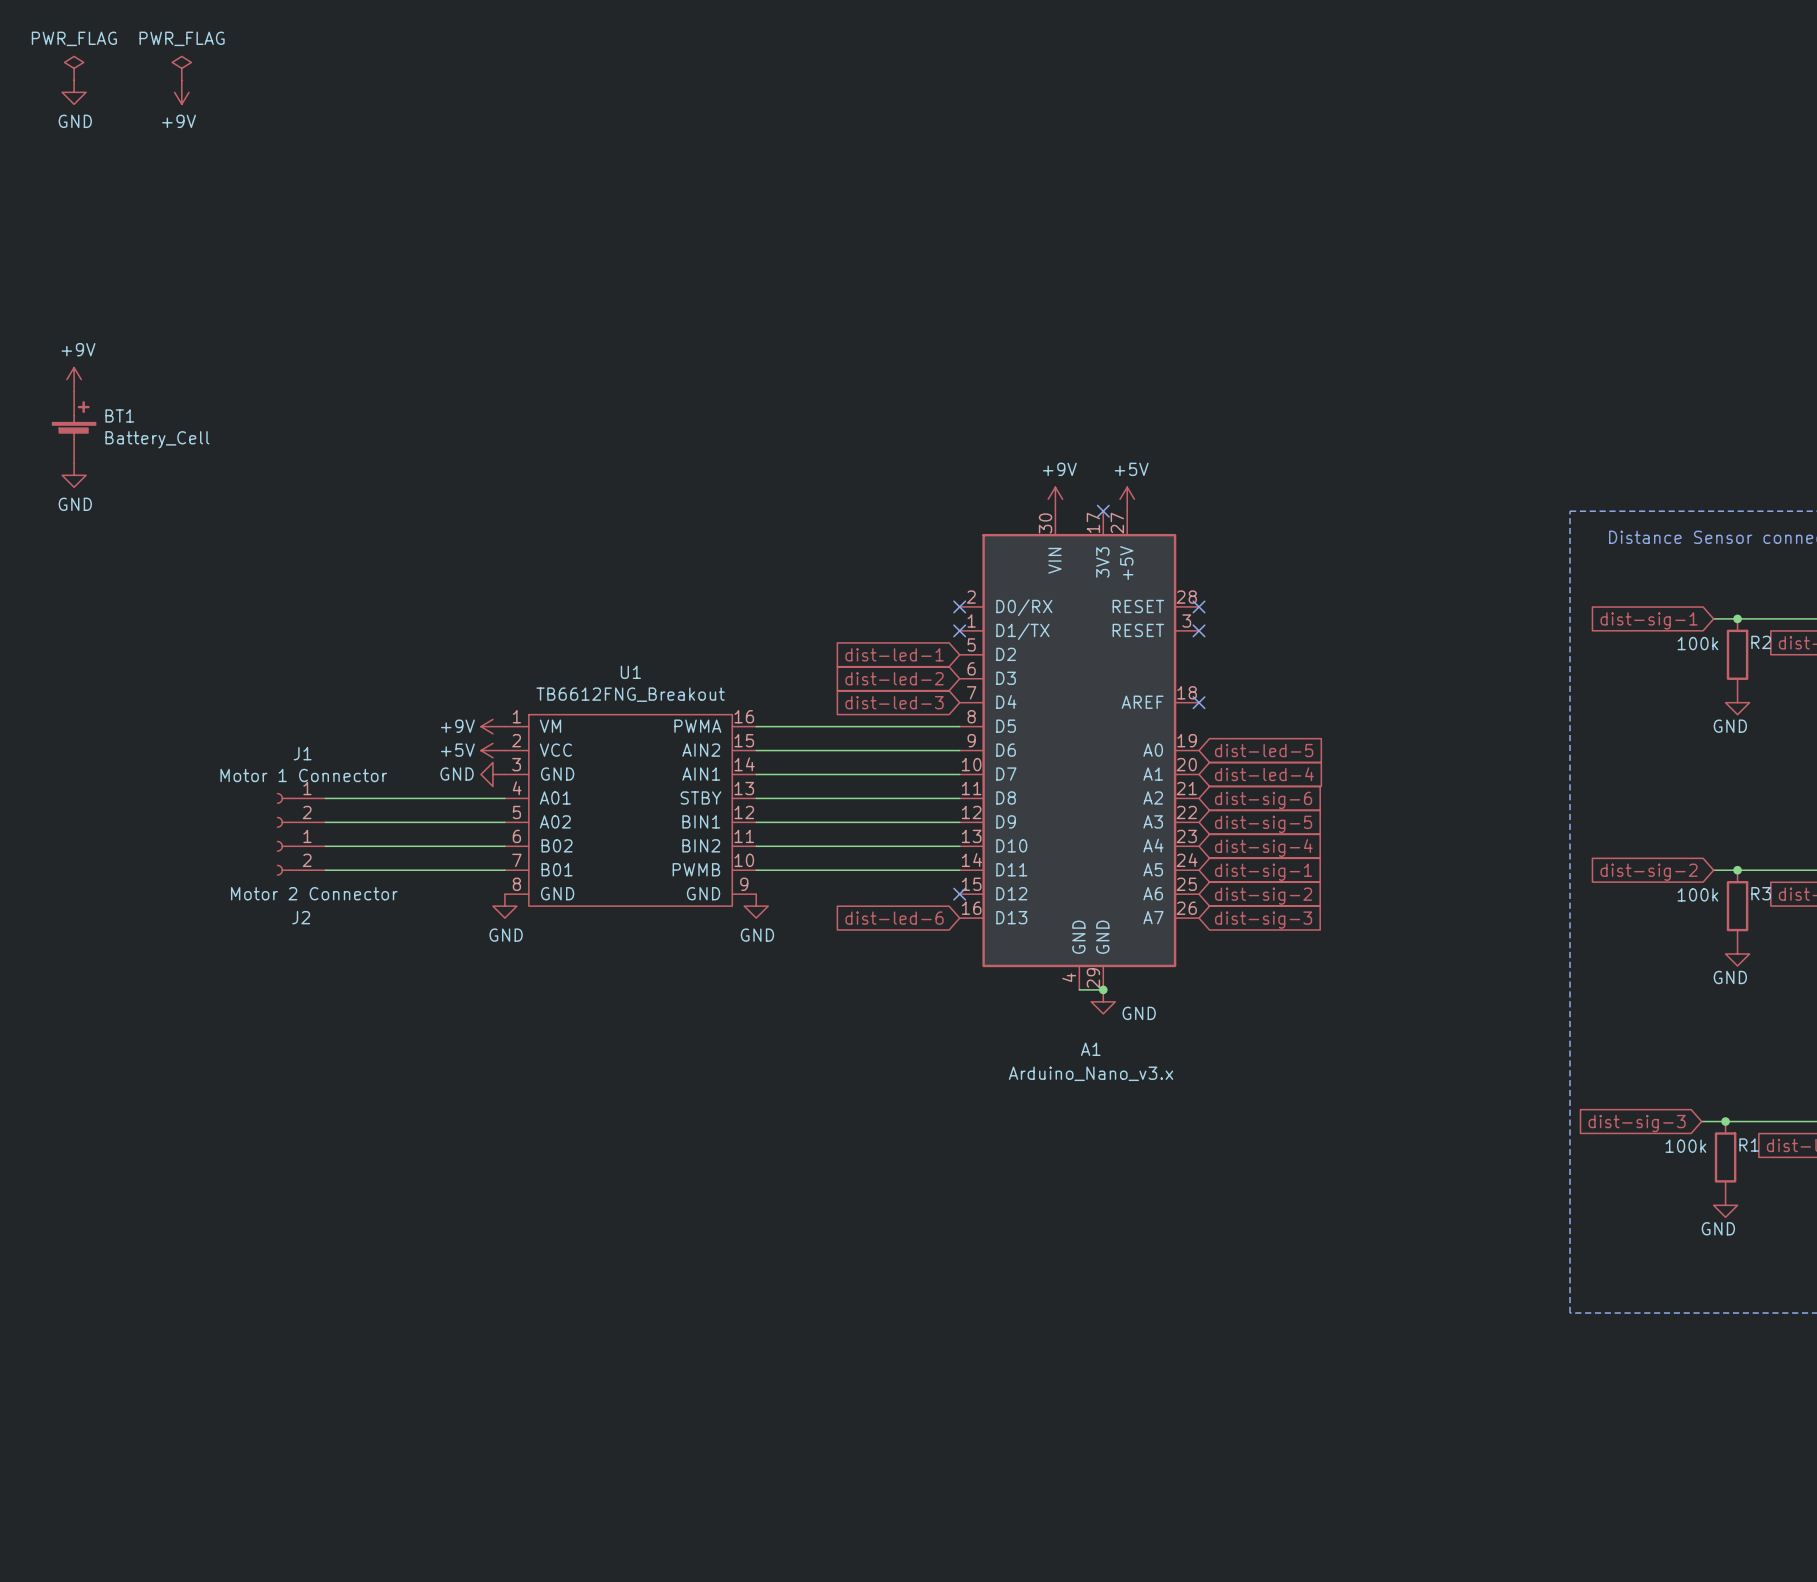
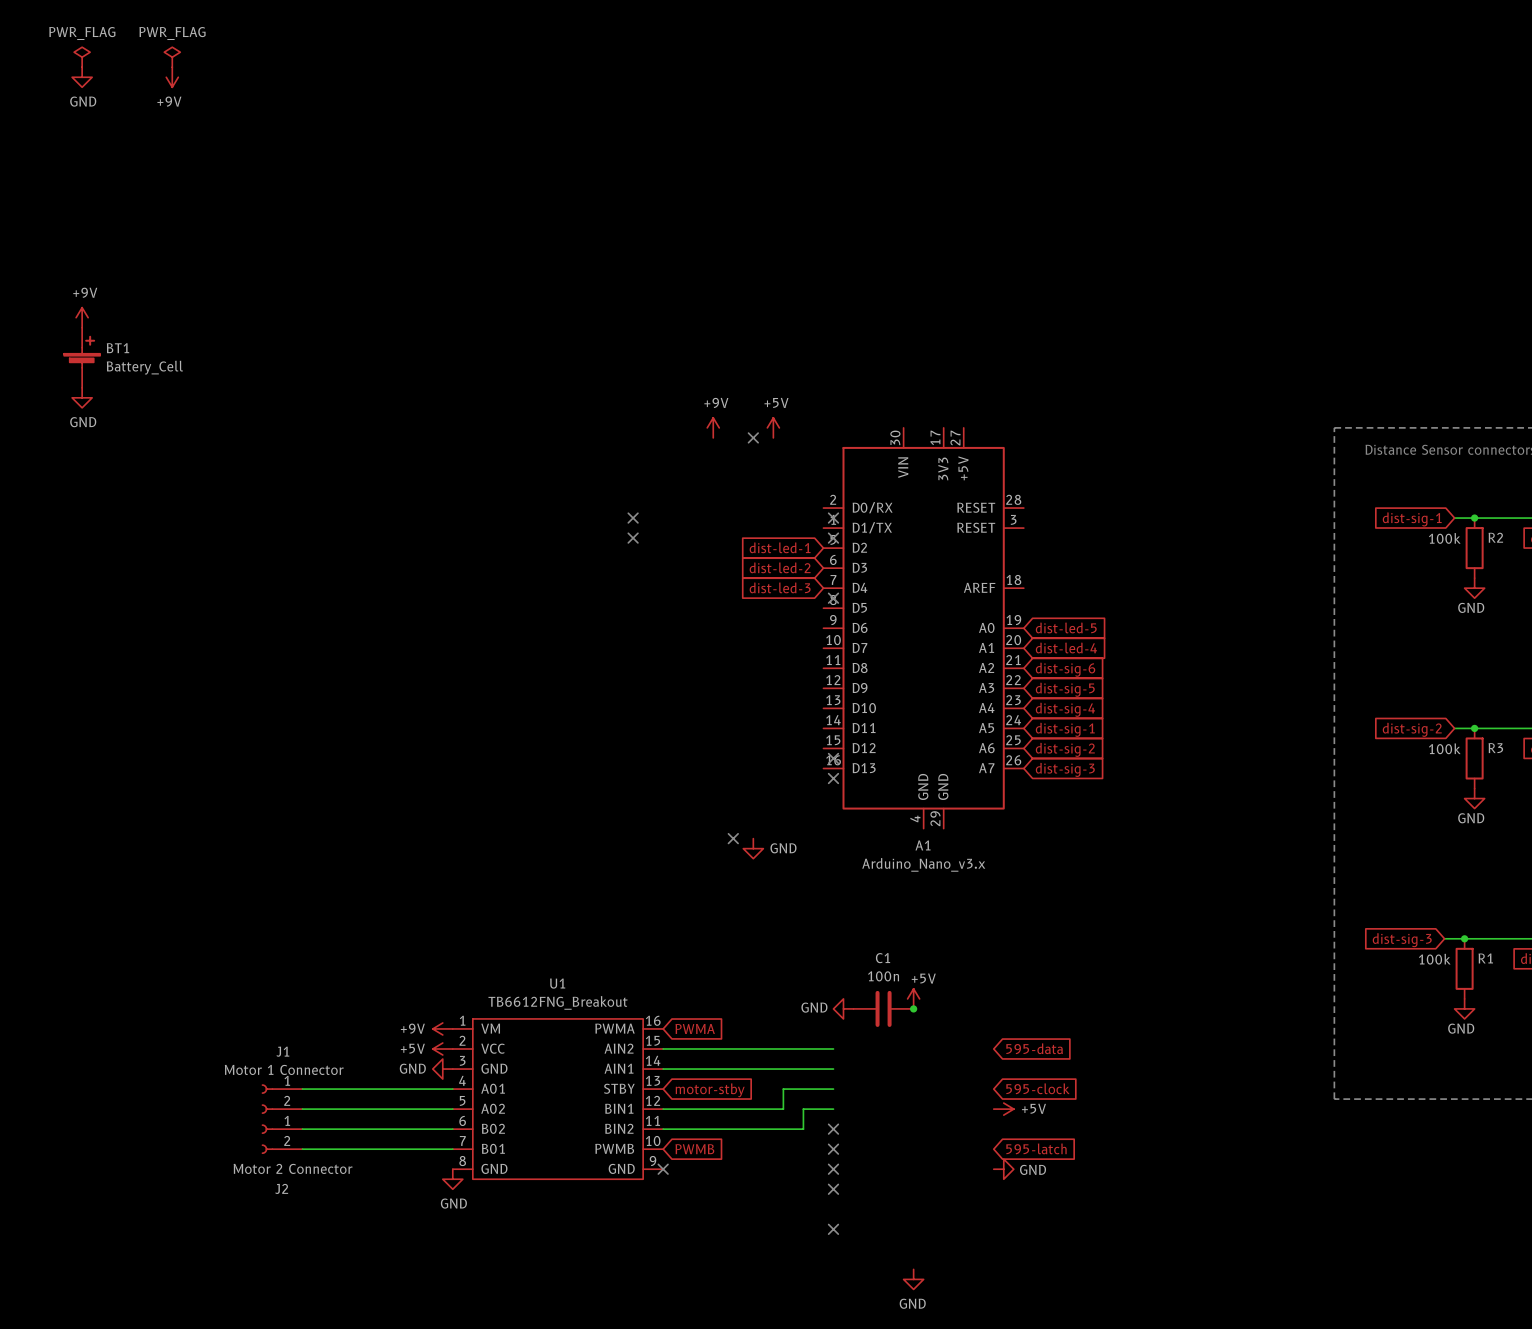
power symbol: +9V (1055, 499) -> none
power symbol position: +5V (1127, 499) -> +5V (773, 427)
power symbol: none -> +9V (713, 427)
no-connect mark: (1103, 511) -> none
no-connect mark: none -> (753, 437)
no-connect mark: (959, 606) -> none
no-connect mark: (1199, 606) -> none
no-connect mark: none -> (633, 518)
no-connect mark: none -> (833, 518)
no-connect mark: (959, 630) -> none
no-connect mark: (1199, 630) -> none
no-connect mark: none -> (633, 538)
no-connect mark: none -> (833, 538)
no-connect mark: (1199, 702) -> none
no-connect mark: none -> (833, 598)
power symbol: +9V (492, 726) -> none
wire: (756, 726) (959, 726) -> none
power symbol: +5V (492, 750) -> none
wire: (756, 750) (959, 750) -> none
power symbol: GND (492, 774) -> none
wire: (756, 774) (959, 774) -> none
wire: (325, 798) (504, 798) -> none
wire: (756, 798) (959, 798) -> none
J1 position: (301, 810) -> (282, 1099)
U1 position: (630, 810) -> (557, 1099)
wire: (325, 822) (504, 822) -> none
wire: (756, 822) (959, 822) -> none
wire: (325, 846) (504, 846) -> none
wire: (756, 846) (959, 846) -> none
J2 position: (301, 858) -> (282, 1139)
wire: (325, 870) (504, 870) -> none
wire: (756, 870) (959, 870) -> none
no-connect mark position: (959, 894) -> (833, 758)
power symbol: GND (504, 906) -> none
power symbol: GND (756, 906) -> none
global label: dist-led-6 (894, 918) -> none
no-connect mark: none -> (833, 778)
wire: (1079, 989) (1103, 989) -> none
junction: (1103, 989) -> none
no-connect mark: none -> (733, 838)
power symbol: GND (1103, 1001) -> none
power symbol: none -> GND (753, 848)
A1 name position: A1 (1090, 1049) -> A1 (923, 845)
A1 value position: Arduino_Nano_v3.x (1091, 1073) -> Arduino_Nano_v3.x (923, 864)
power symbol: none -> +5V (913, 998)
power symbol: none -> GND (843, 1008)
C1: none -> 100n (883, 1008)
junction: none -> (913, 1008)
power symbol: none -> +9V (442, 1028)
global label: none -> PWMA (695, 1028)
power symbol: none -> +5V (442, 1049)
wire: none -> (663, 1049) (833, 1049)
global label: none -> 595-data (1034, 1048)
power symbol: none -> GND (442, 1069)
wire: none -> (663, 1069) (833, 1069)
wire: none -> (302, 1089) (452, 1089)
wire: none -> (833, 1089) (783, 1089) (783, 1109) (663, 1109)
global label: none -> 595-clock (1037, 1088)
global label: none -> motor-stby (710, 1090)
wire: none -> (302, 1109) (452, 1109)
wire: none -> (833, 1109) (803, 1109) (803, 1129) (663, 1129)
power symbol: none -> +5V (1003, 1109)
wire: none -> (302, 1129) (452, 1129)
no-connect mark: none -> (833, 1129)
wire: none -> (302, 1149) (452, 1149)
global label: none -> PWMB (694, 1149)
no-connect mark: none -> (833, 1149)
global label: none -> 595-latch (1036, 1148)
no-connect mark: none -> (663, 1169)
no-connect mark: none -> (833, 1169)
power symbol: none -> GND (1003, 1169)
power symbol: none -> GND (452, 1179)
no-connect mark: none -> (833, 1189)
no-connect mark: none -> (833, 1229)
power symbol: none -> GND (913, 1279)

